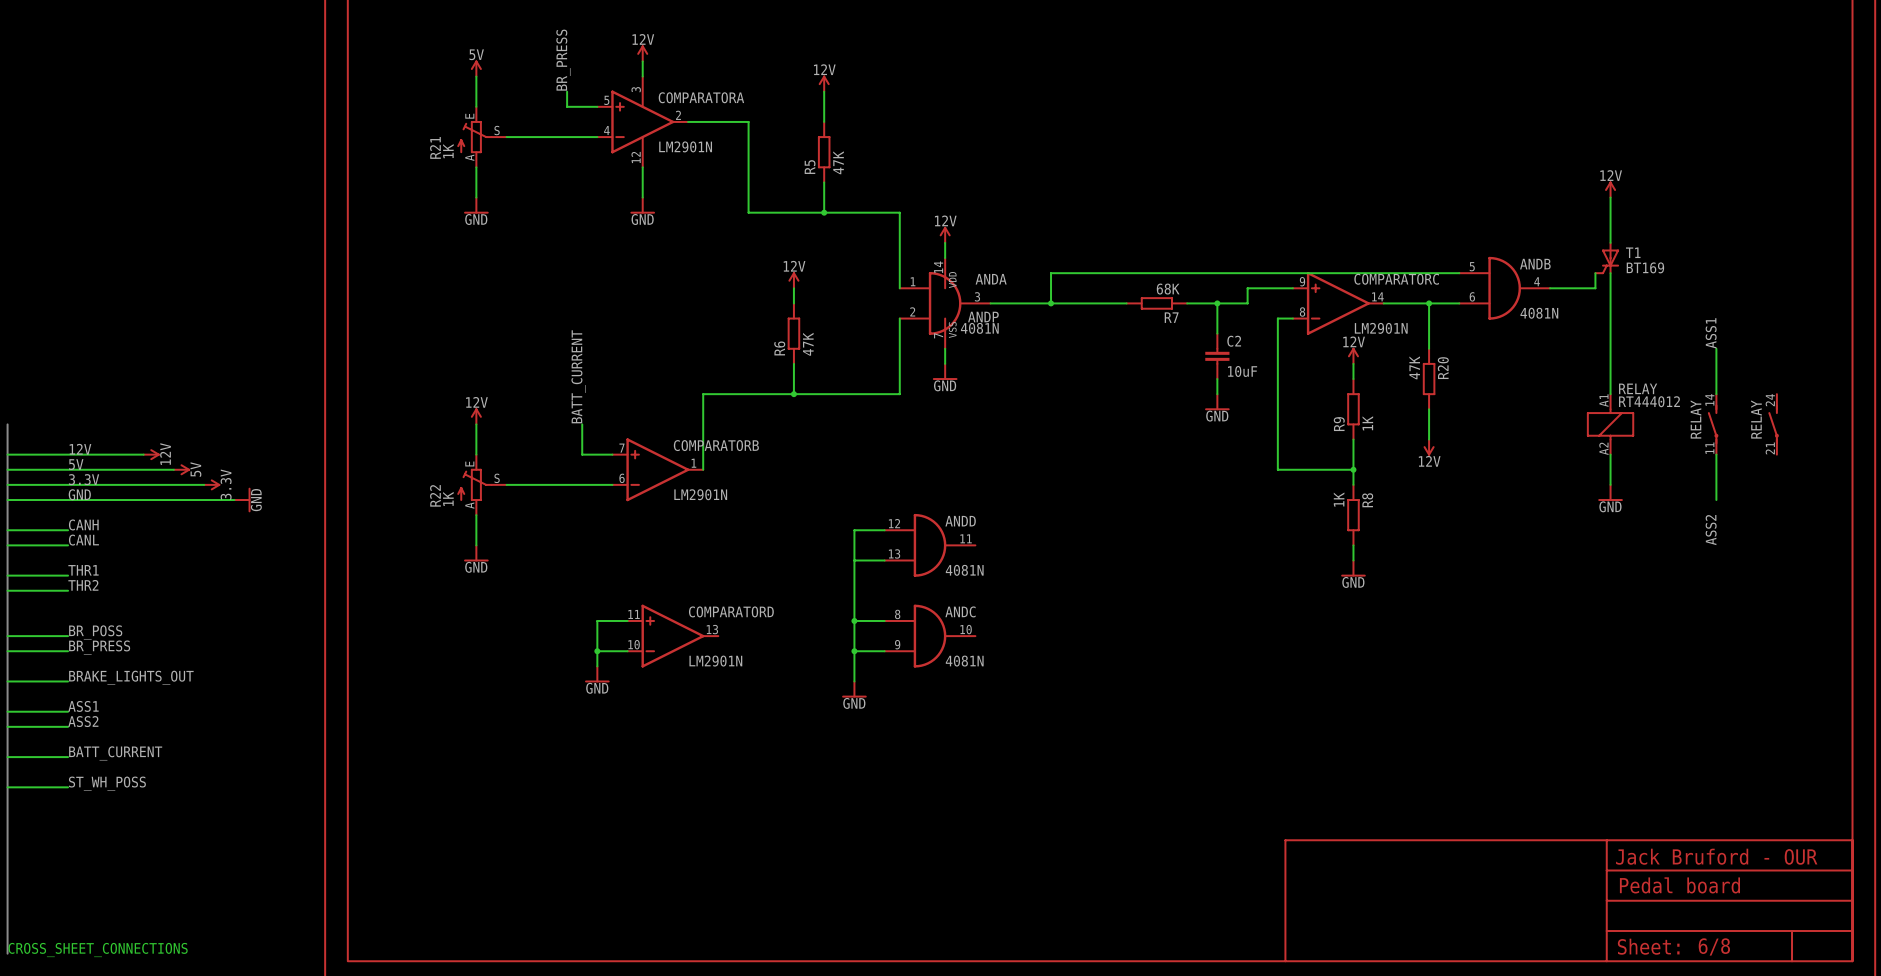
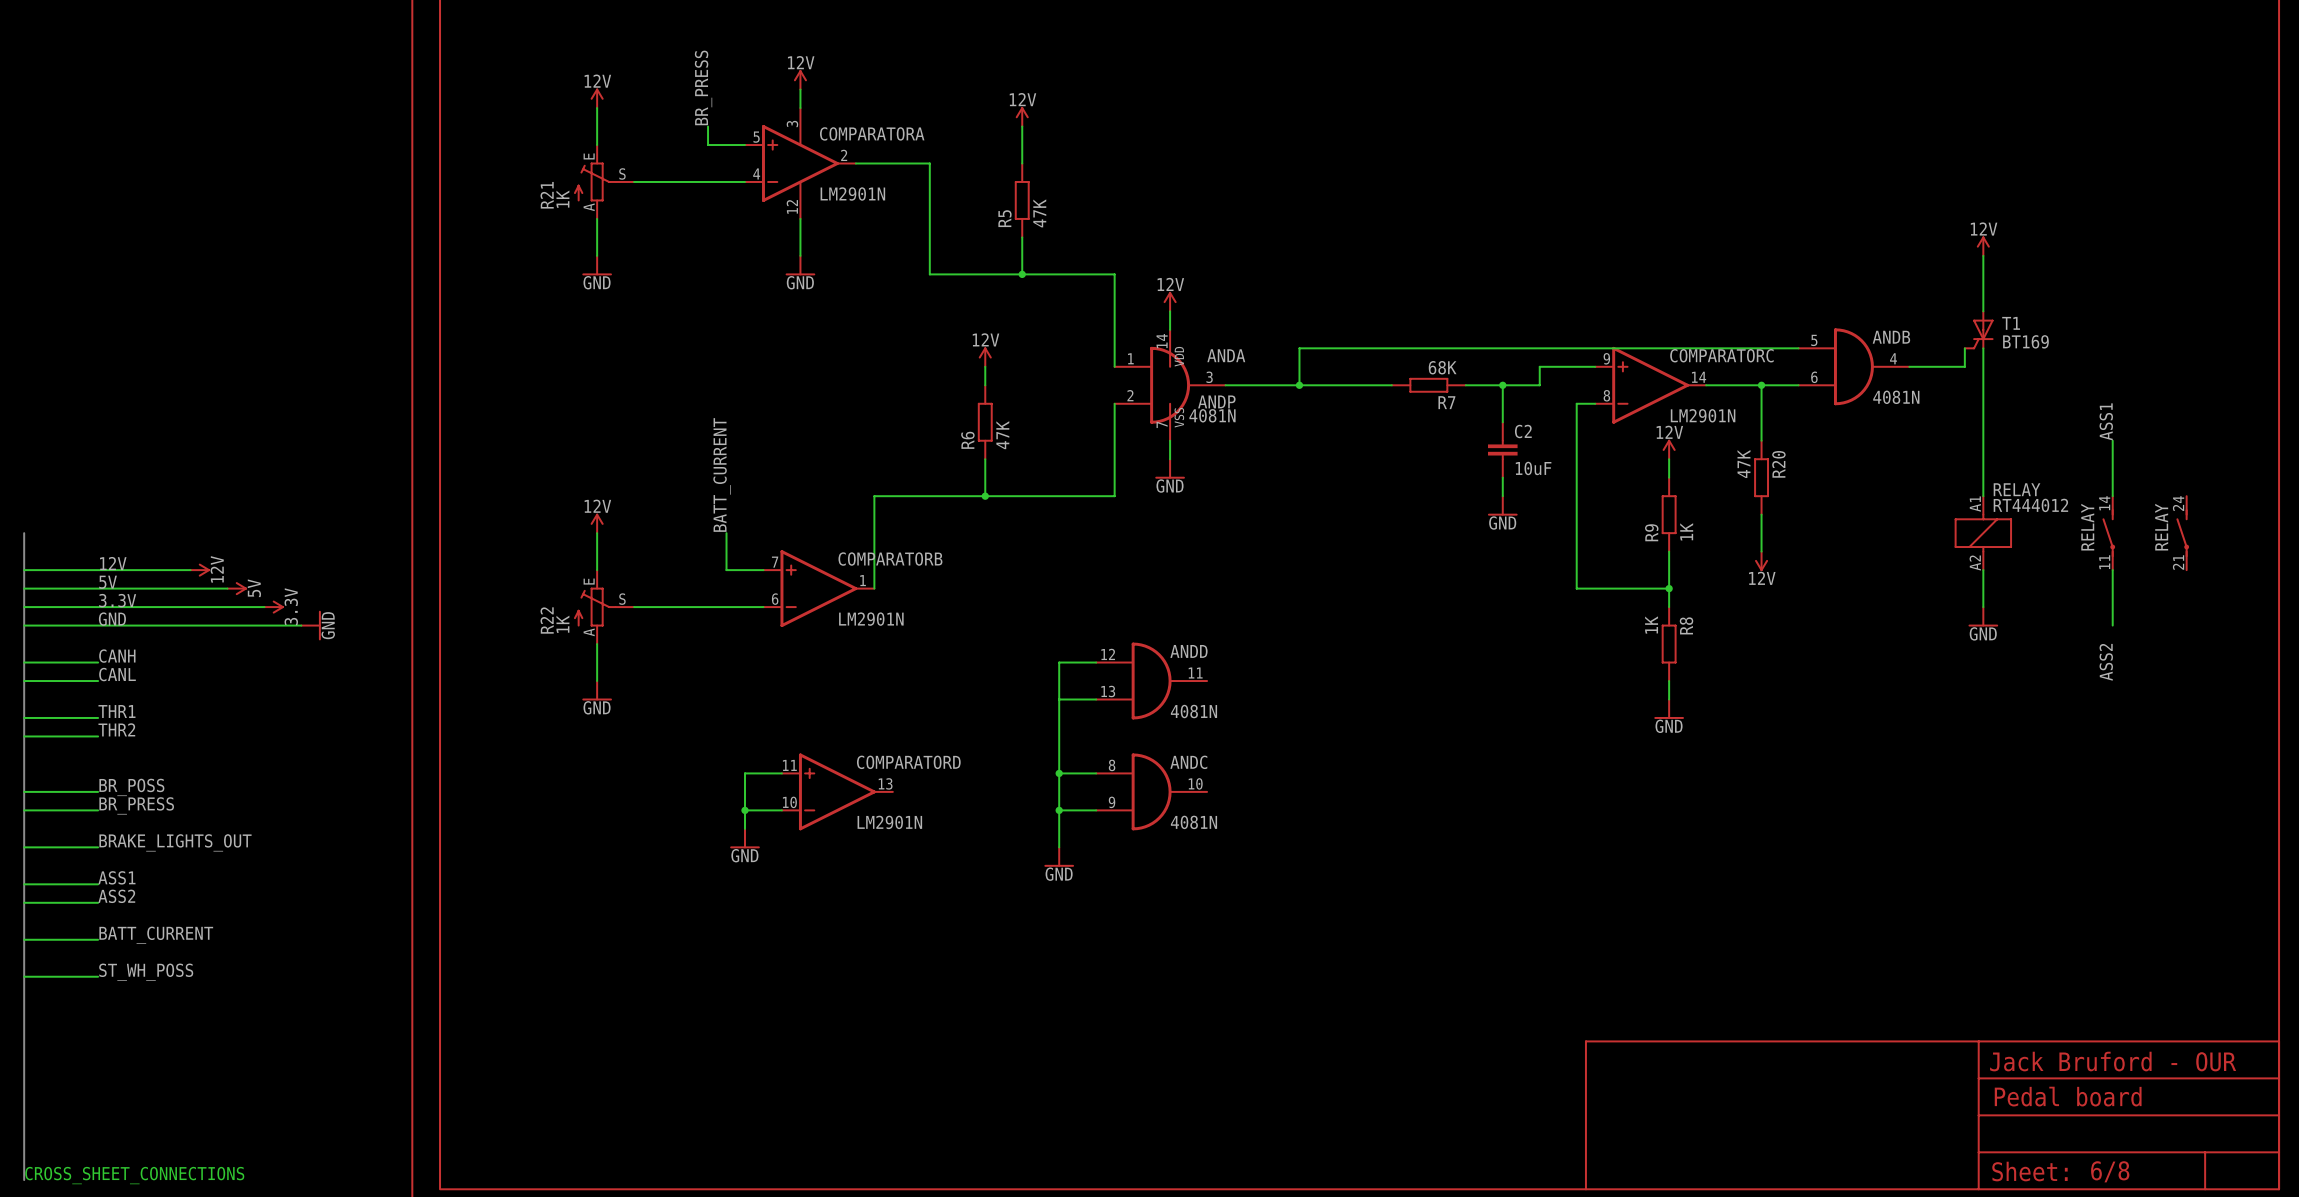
power symbol: 5V (476, 68) -> 12V (597, 98)

